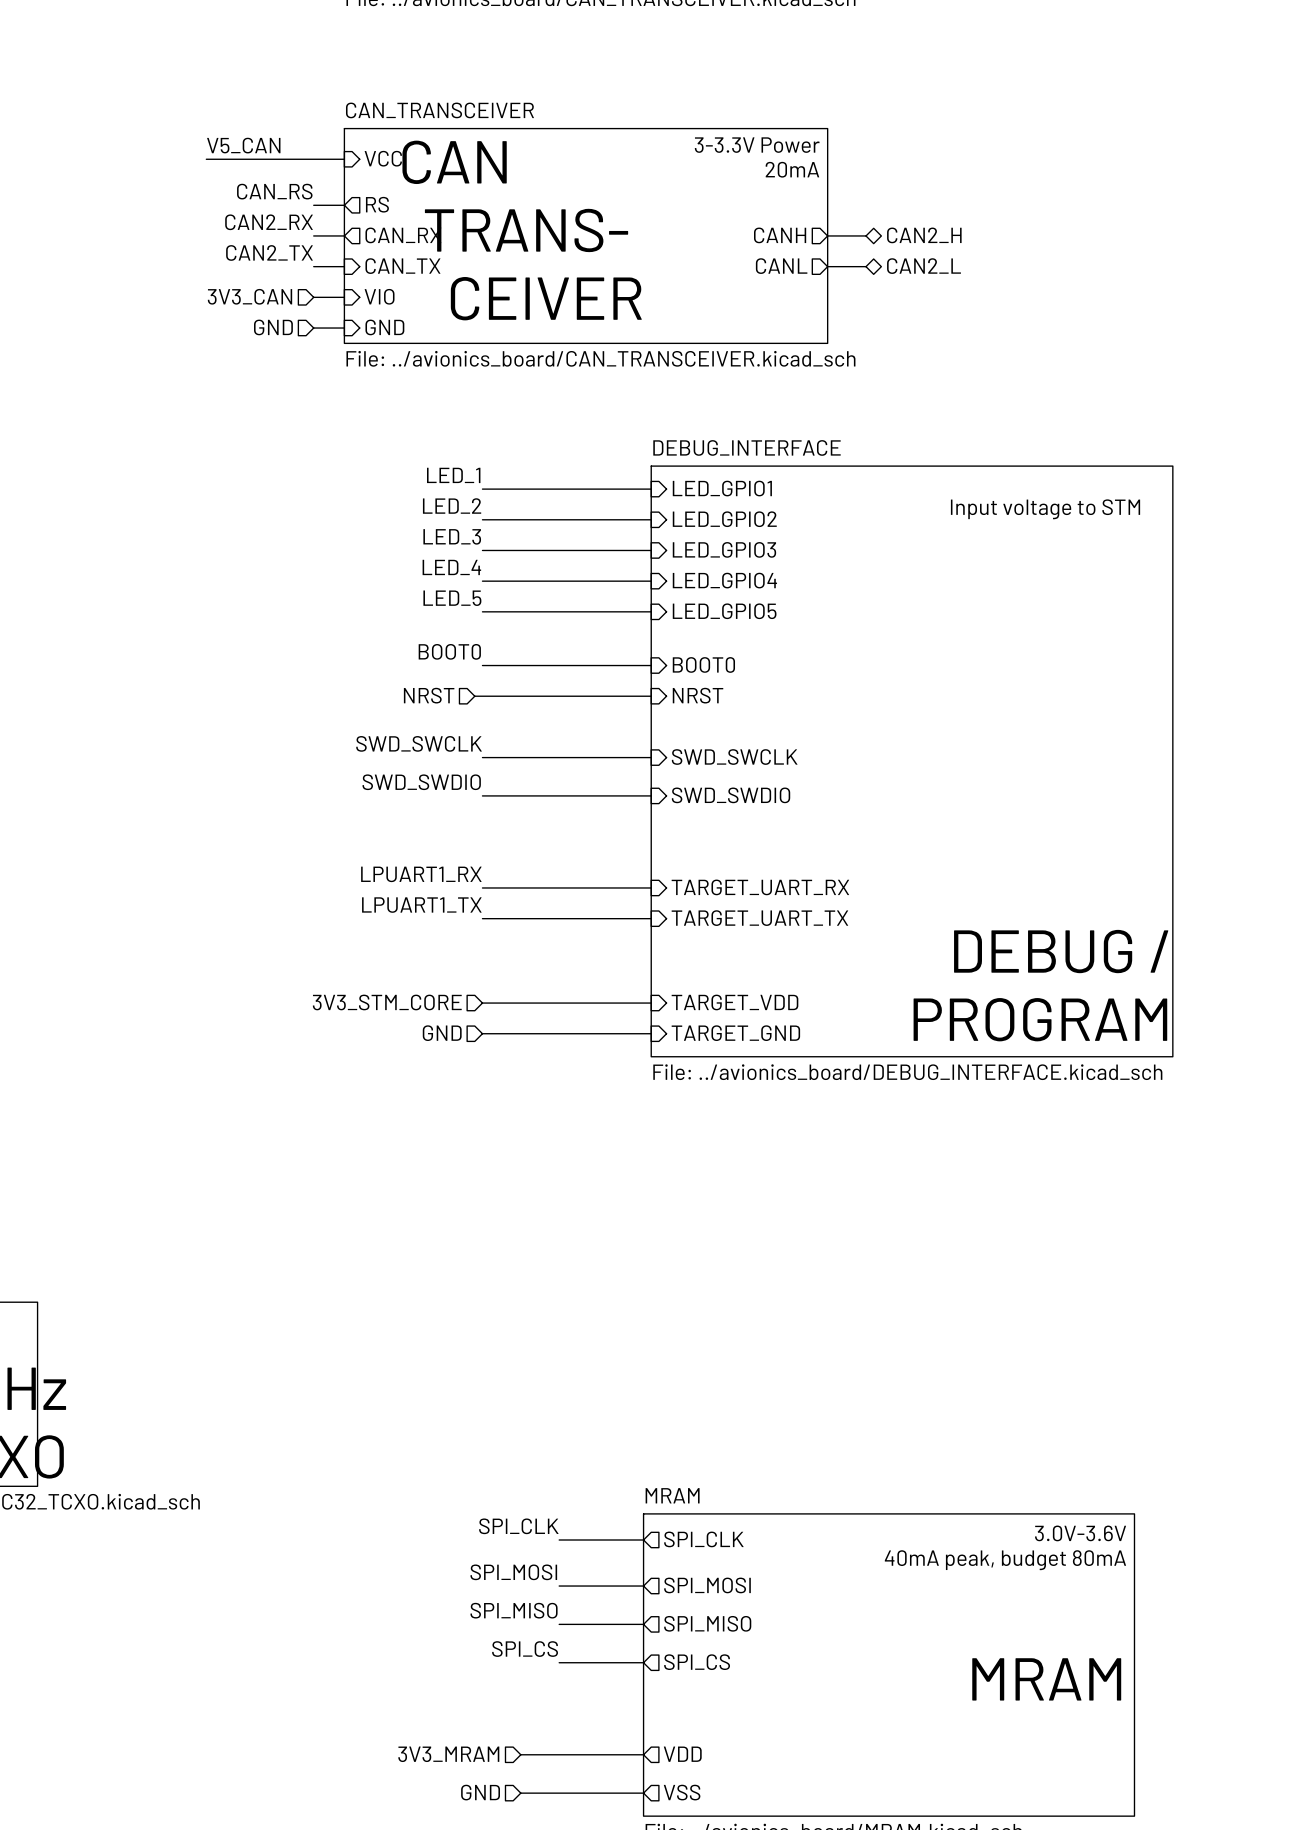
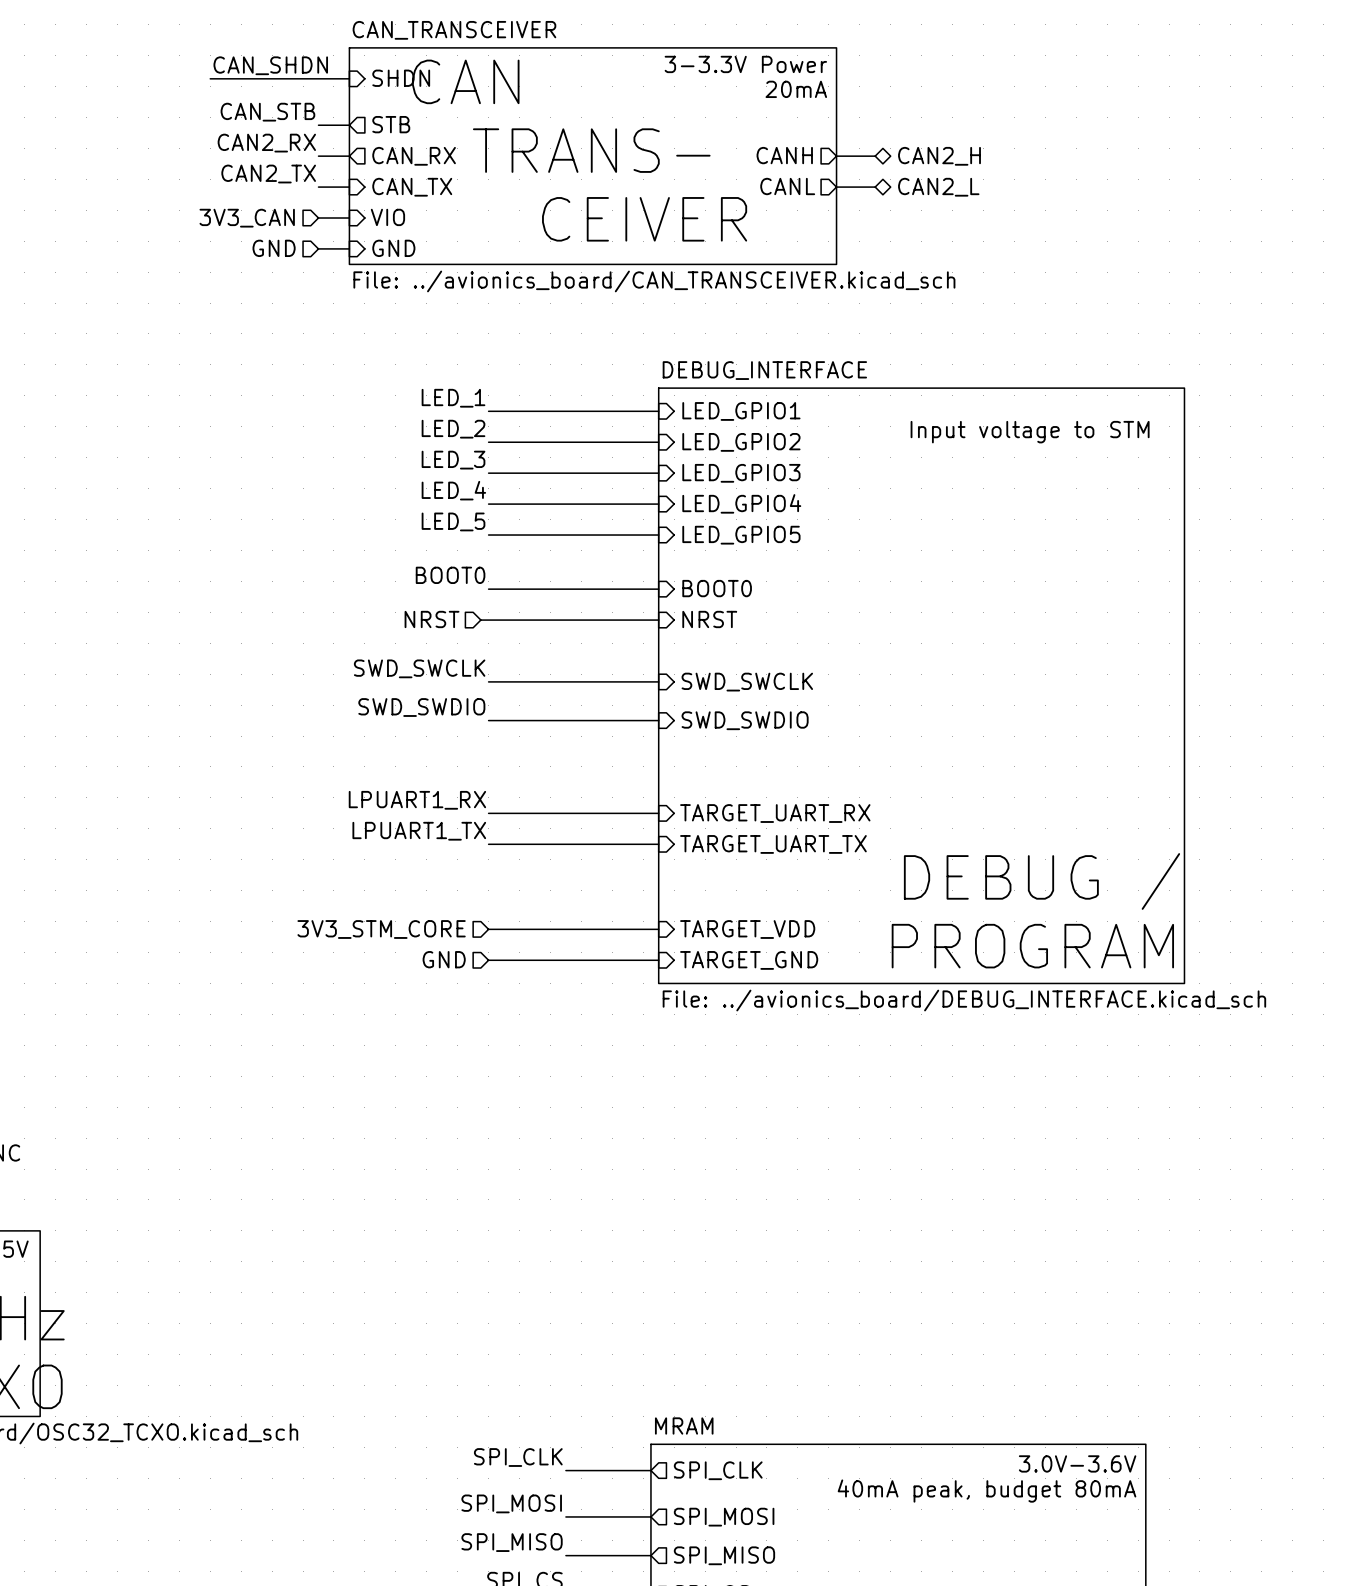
label: V5_CAN (243, 145) -> CAN_SHDN (270, 65)
sheet pin: VCC (383, 158) -> SHDN (401, 78)
label: CAN_RS (274, 191) -> CAN_STB (267, 112)
sheet pin: RS (377, 204) -> STB (391, 124)

